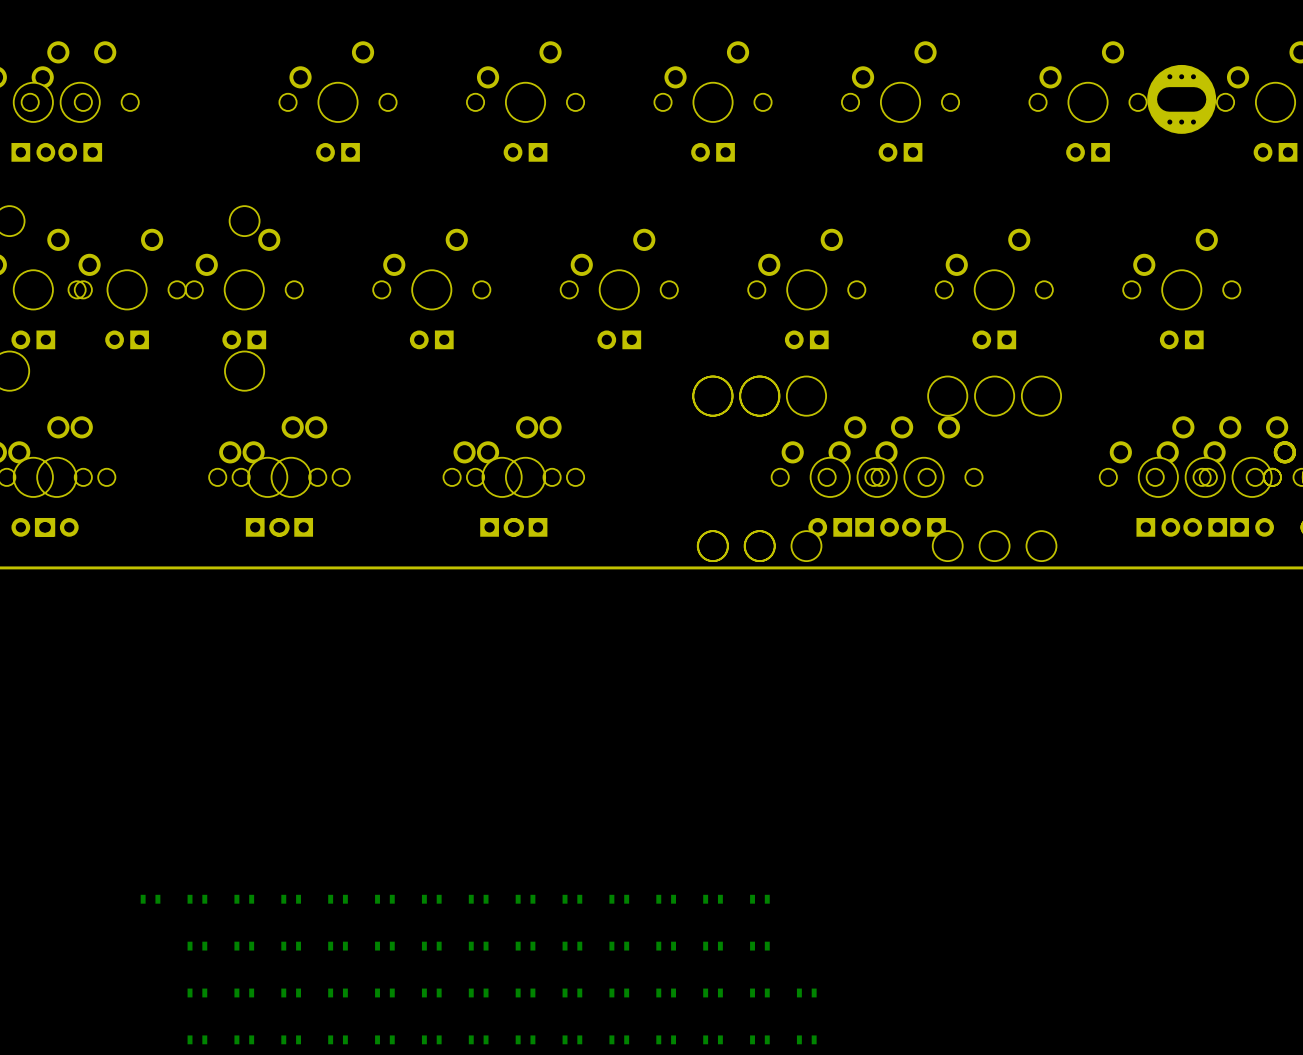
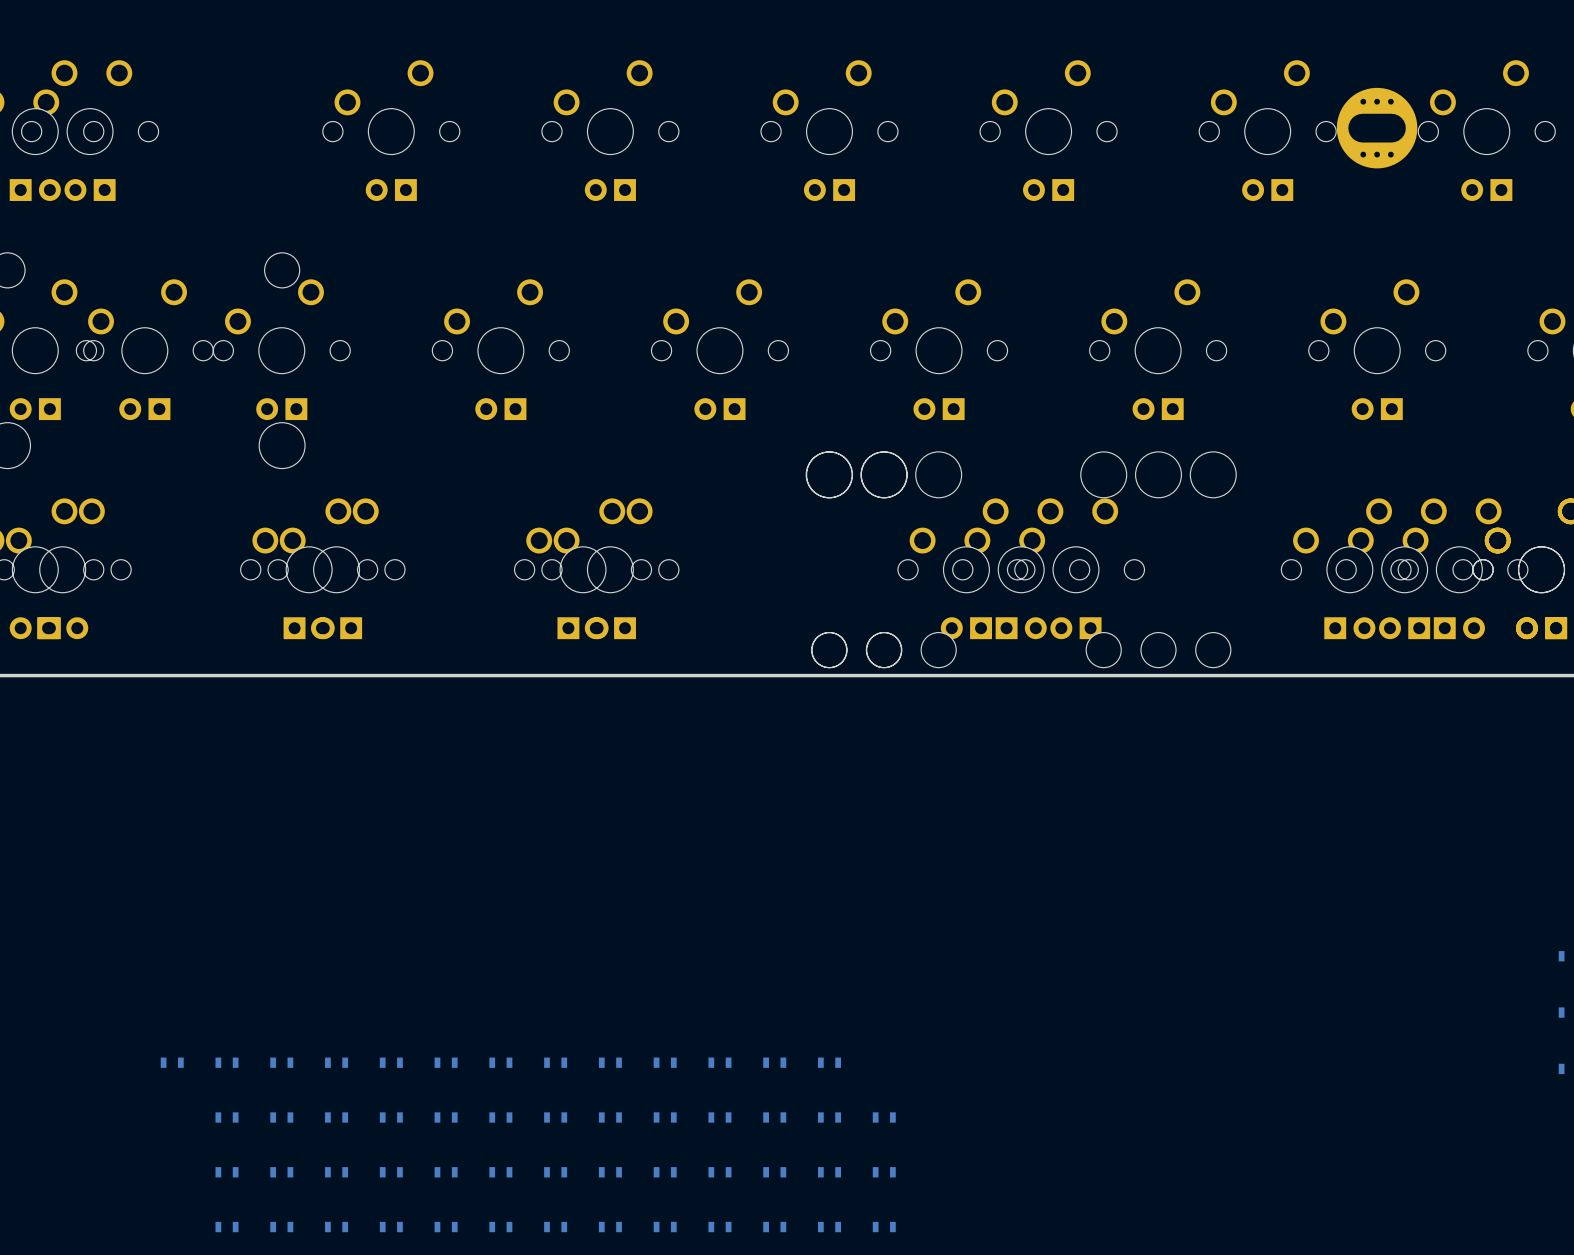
part: (759, 899) -> none
part: (806, 992) -> none
part: (806, 1039) -> none

